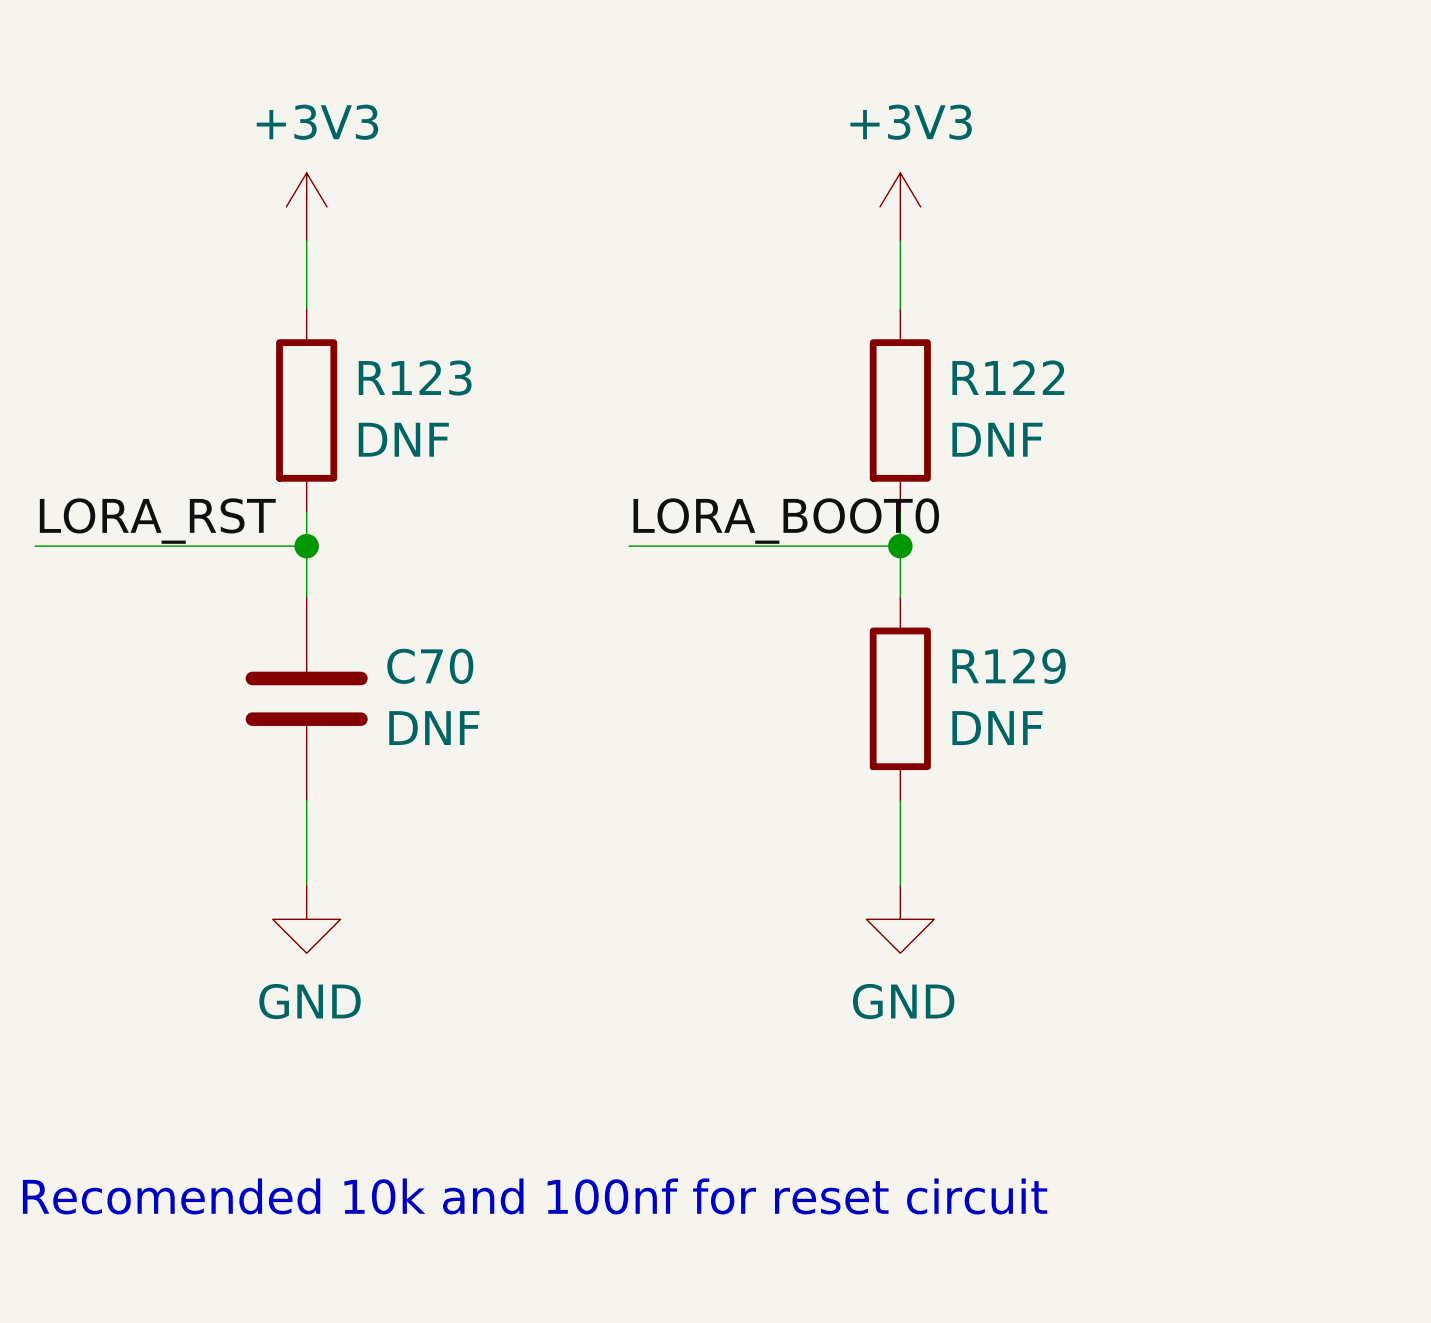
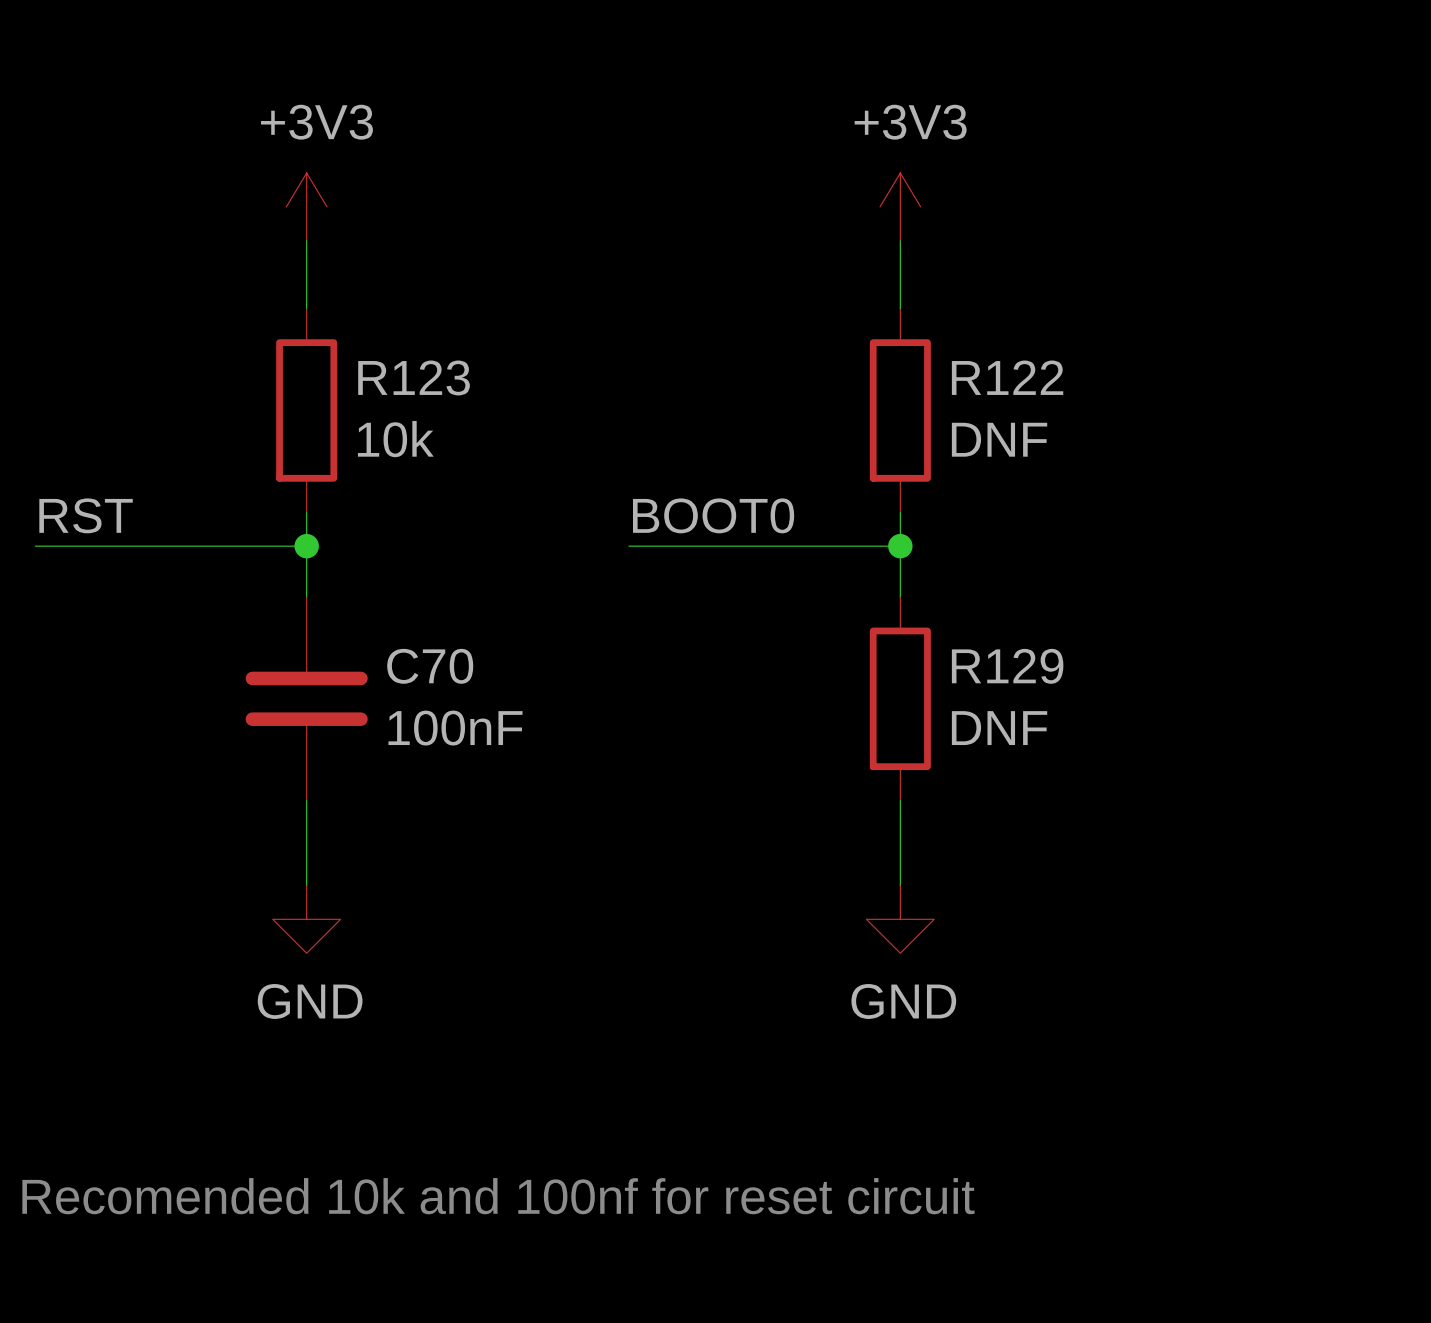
R123 value: DNF (403, 439) -> 10k (395, 439)
label: LORA_RST (157, 521) -> RST (86, 515)
label: LORA_BOOT0 (786, 521) -> BOOT0 (713, 515)
C70 value: DNF (434, 728) -> 100nF (455, 728)

